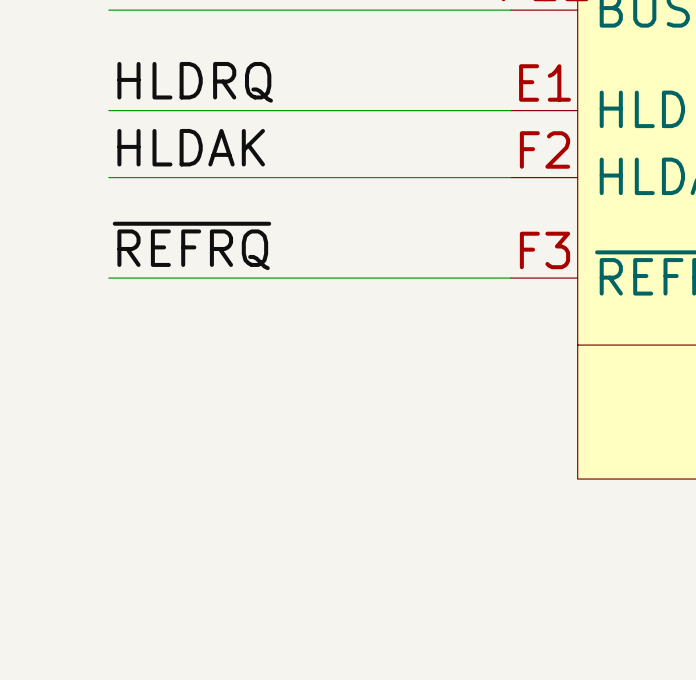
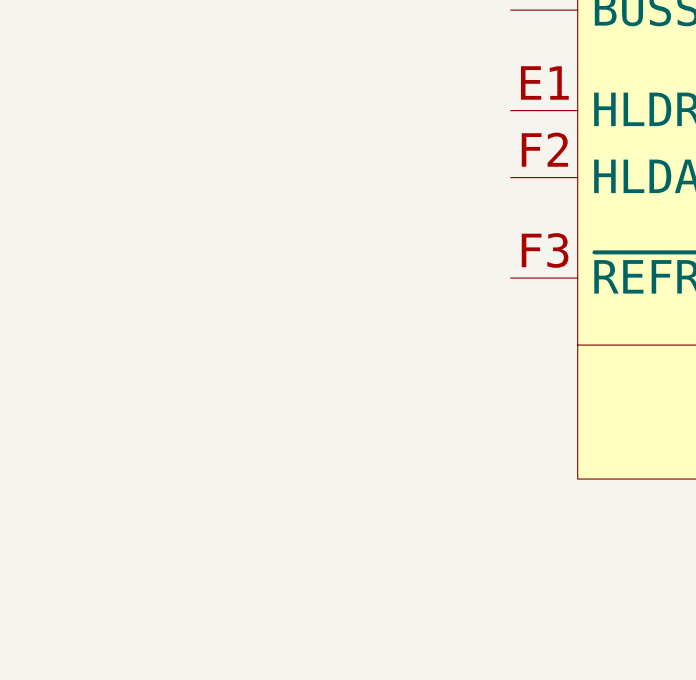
wire: (108, 10) (510, 10) -> none
label: HLDRQ (195, 82) -> none
wire: (108, 110) (510, 110) -> none
label: HLDAK (191, 147) -> none
wire: (108, 177) (510, 177) -> none
label: ~{REFRQ} (191, 245) -> none
wire: (108, 278) (510, 278) -> none

